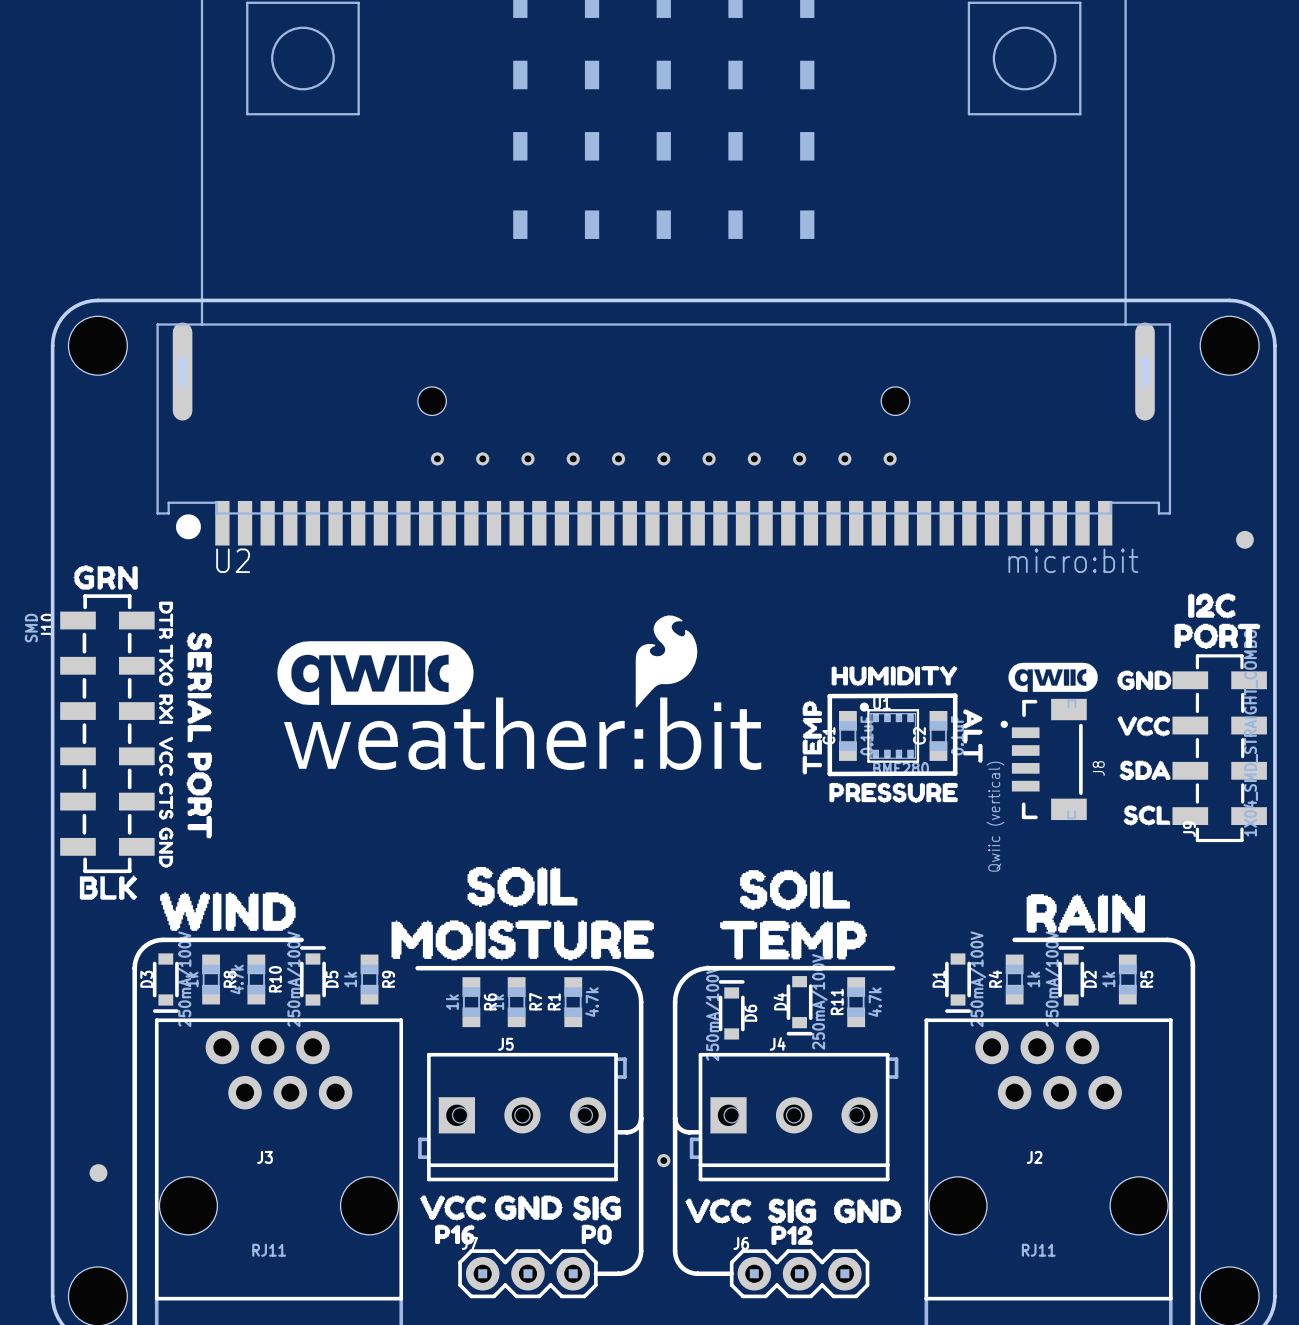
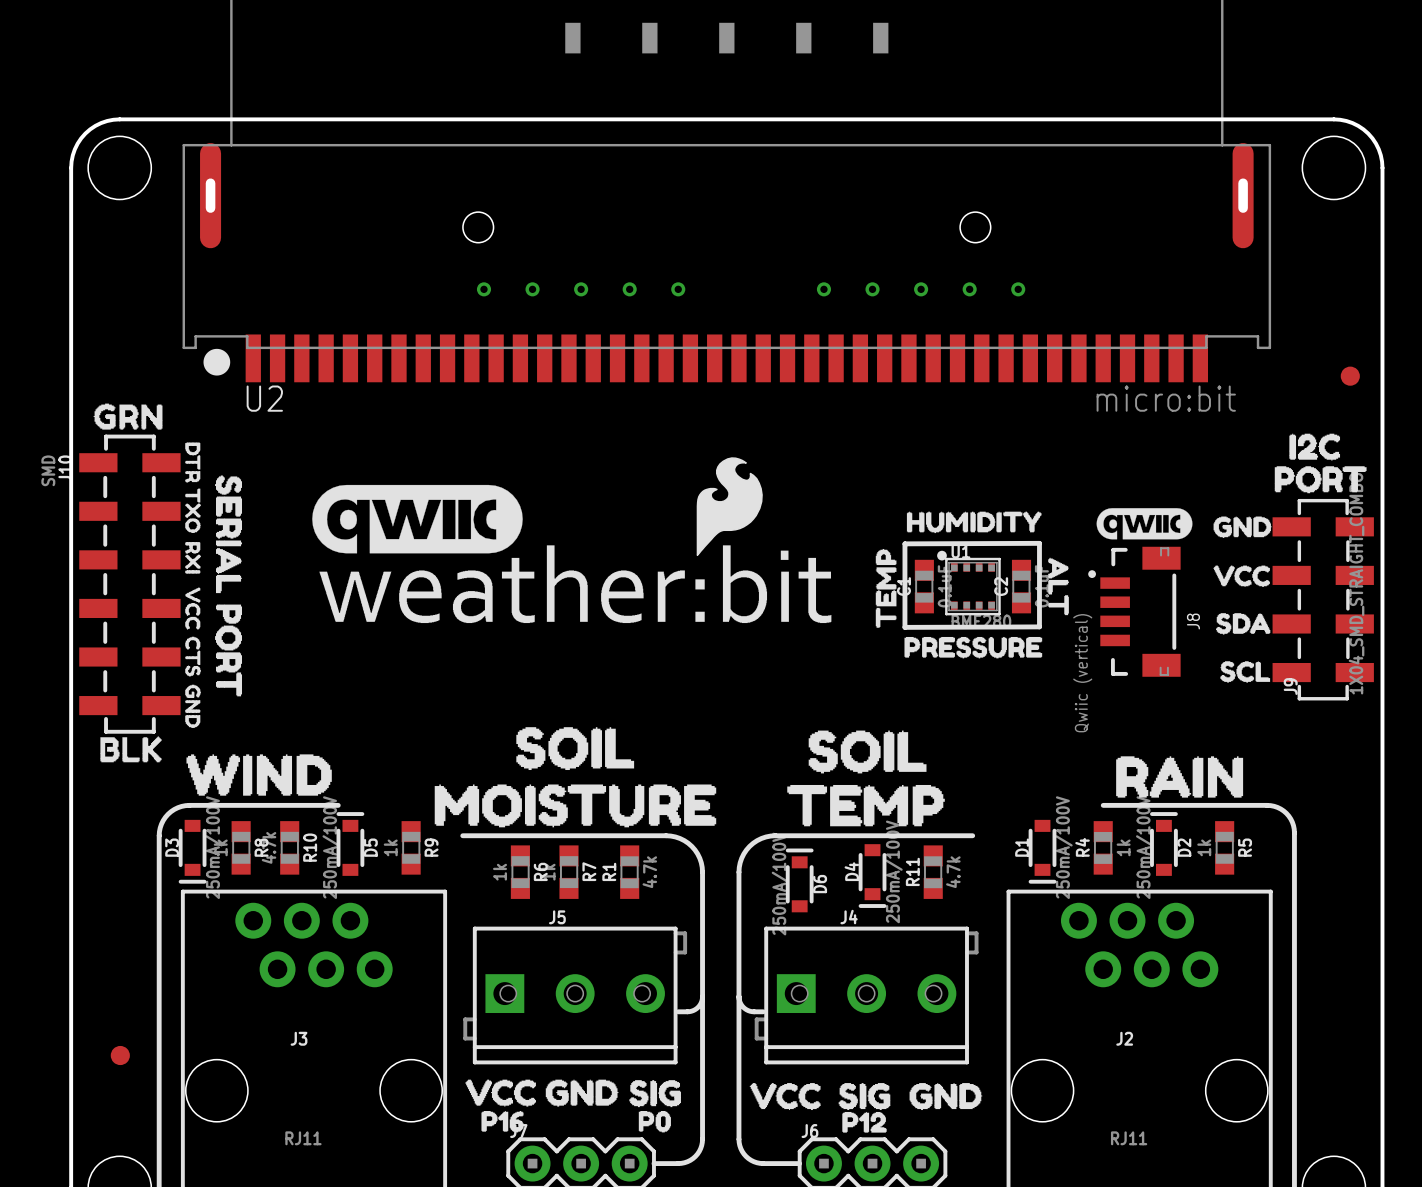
part: (663, 458) -> none
part: (709, 458) -> none
part: none -> (1018, 289)
part: (663, 1160) -> none

